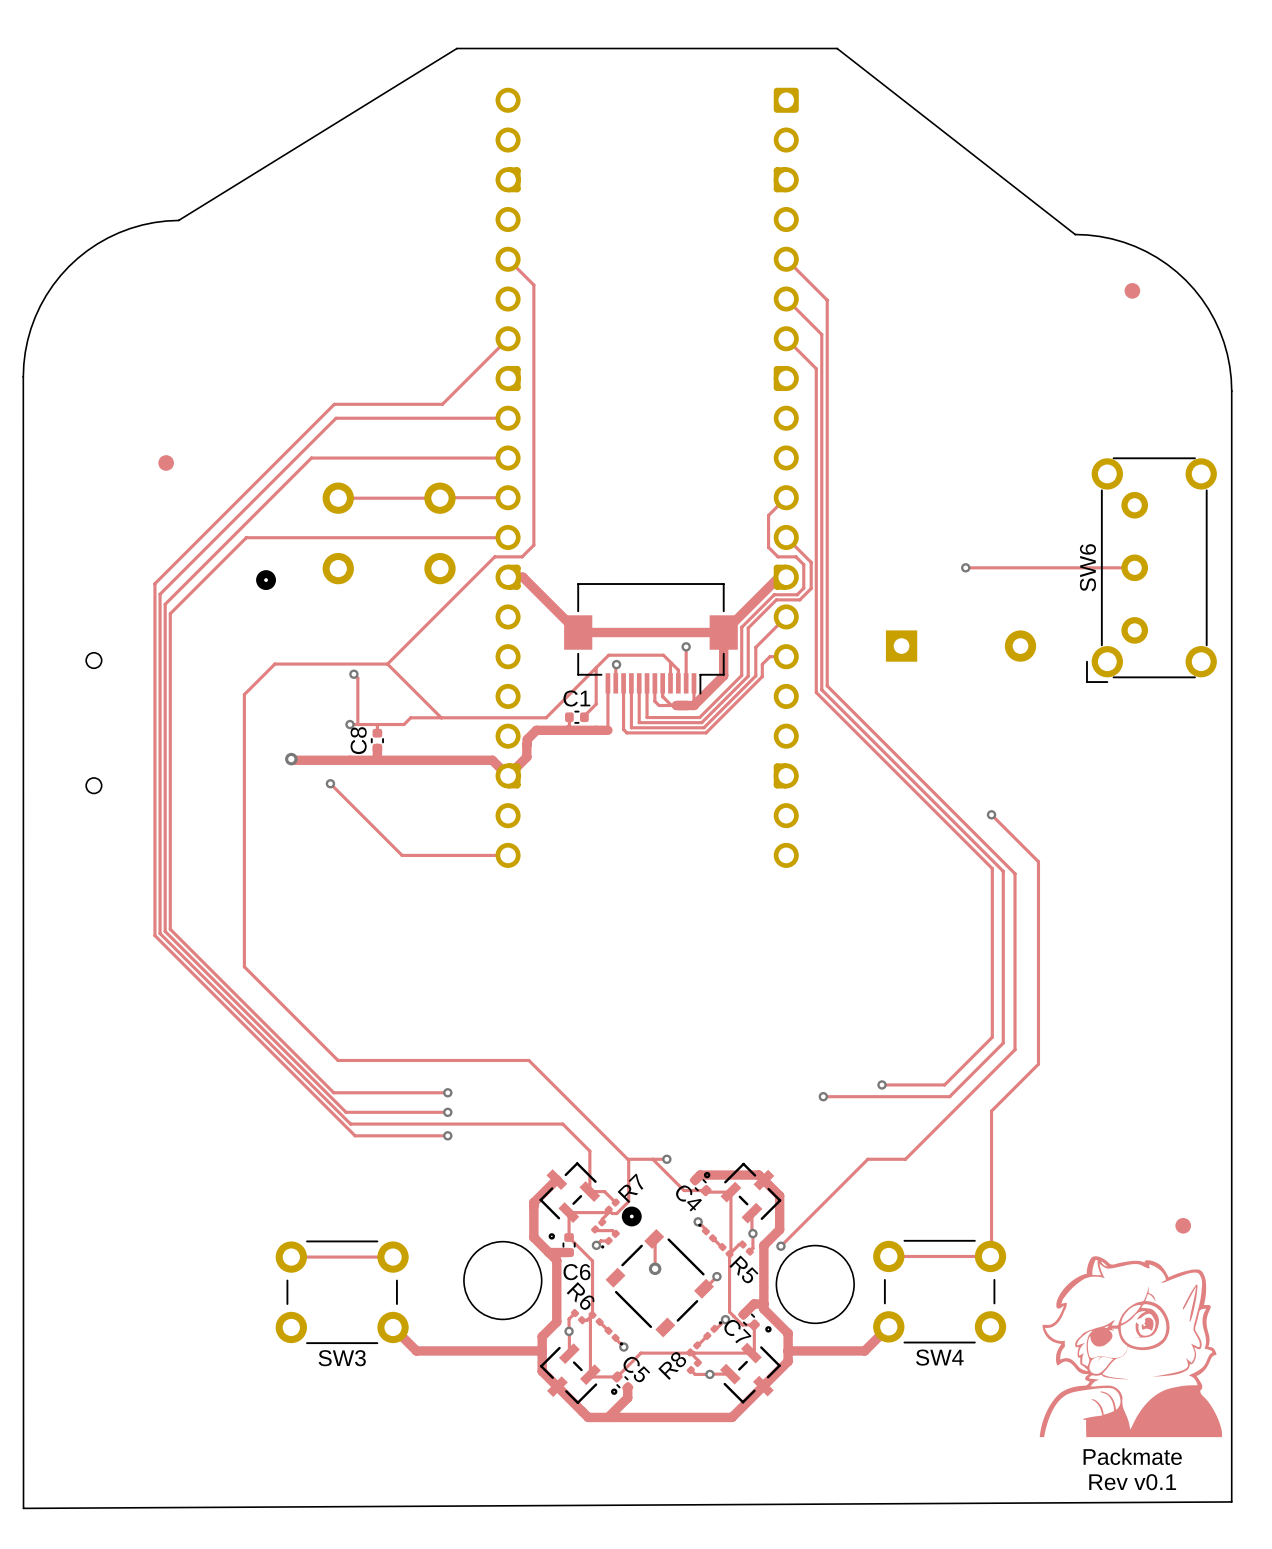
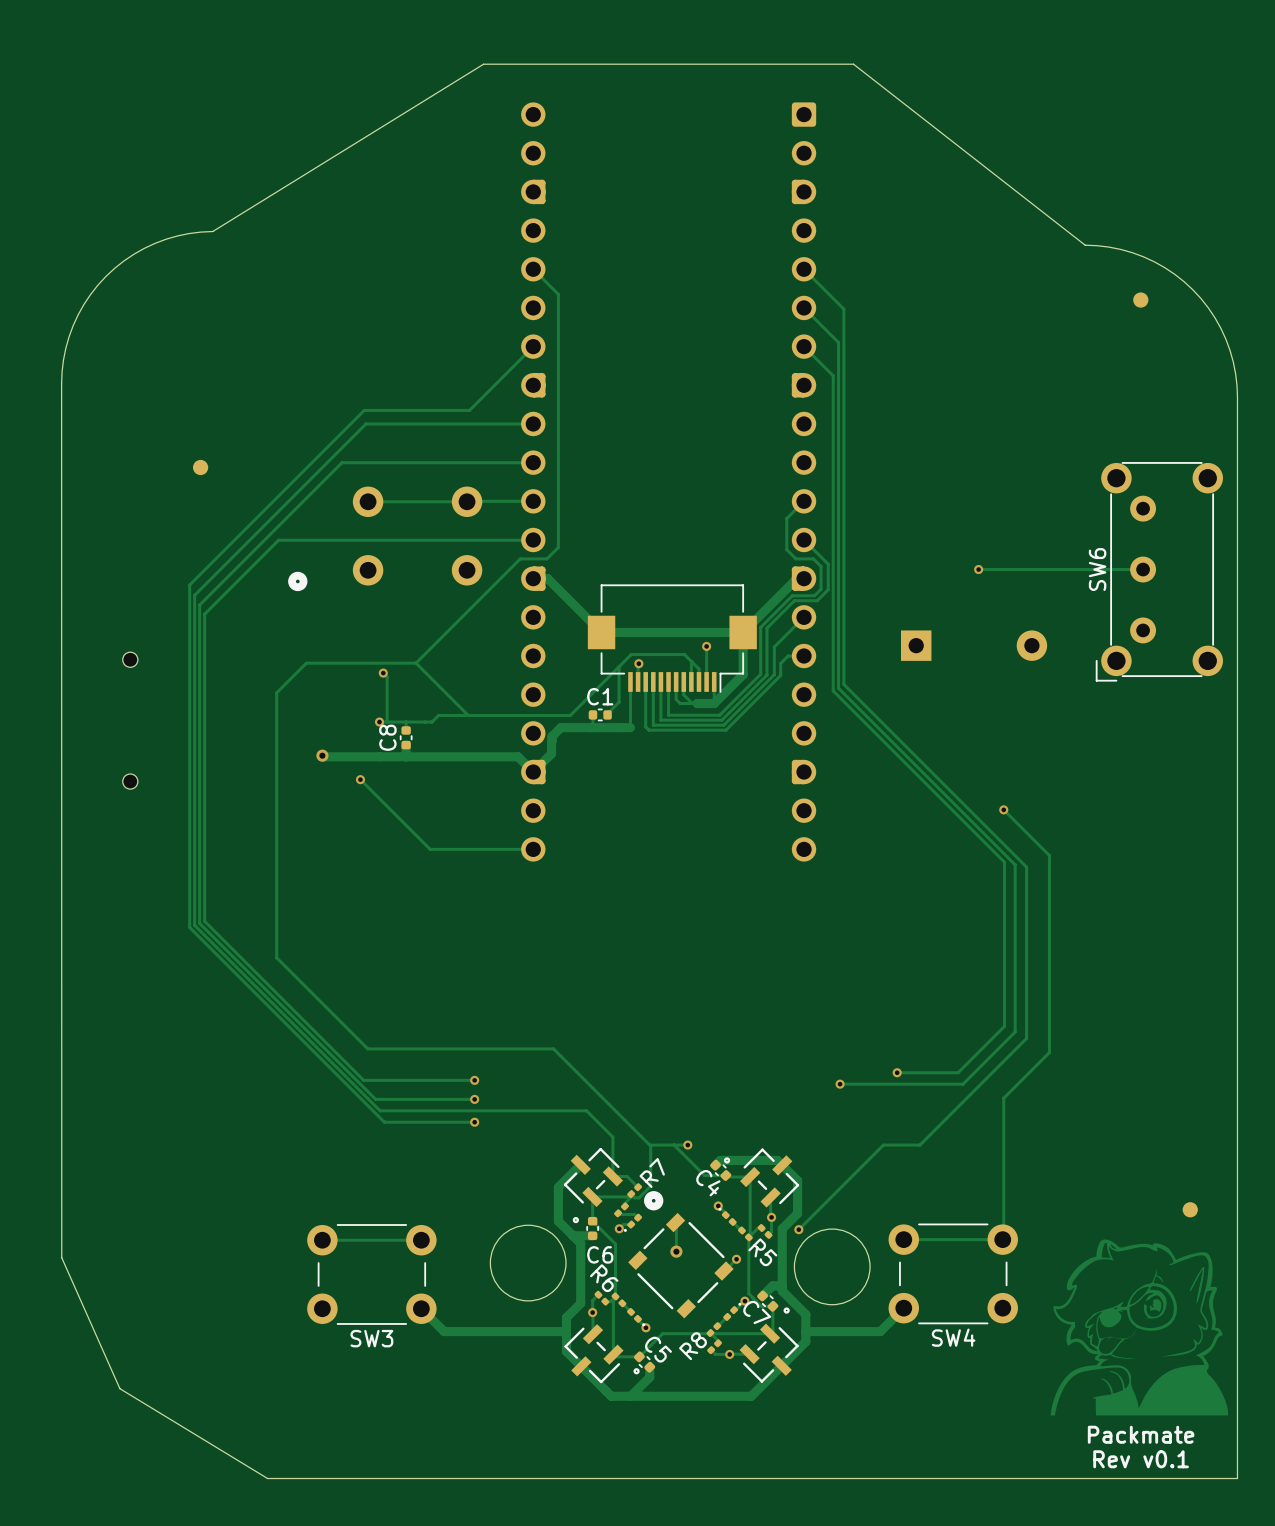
board edge: (23, 1275) (23, 1508) (1231, 1501) -> (61, 1257) (119, 1388) (267, 1478) (1237, 1478)

